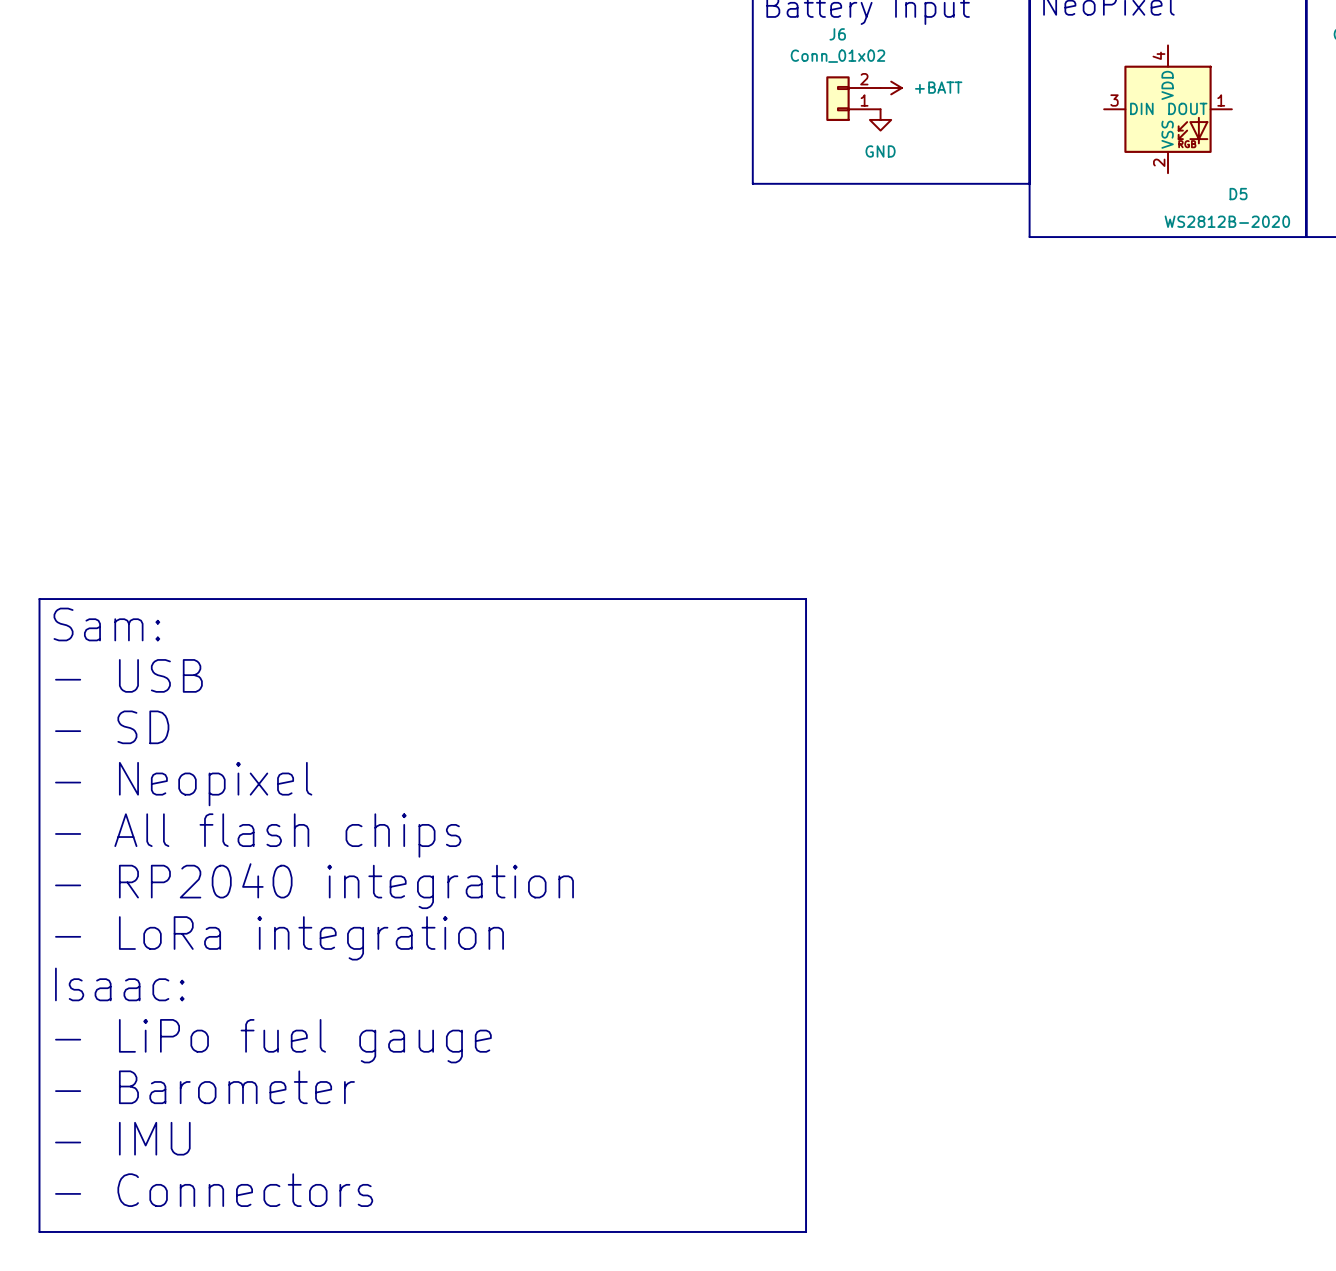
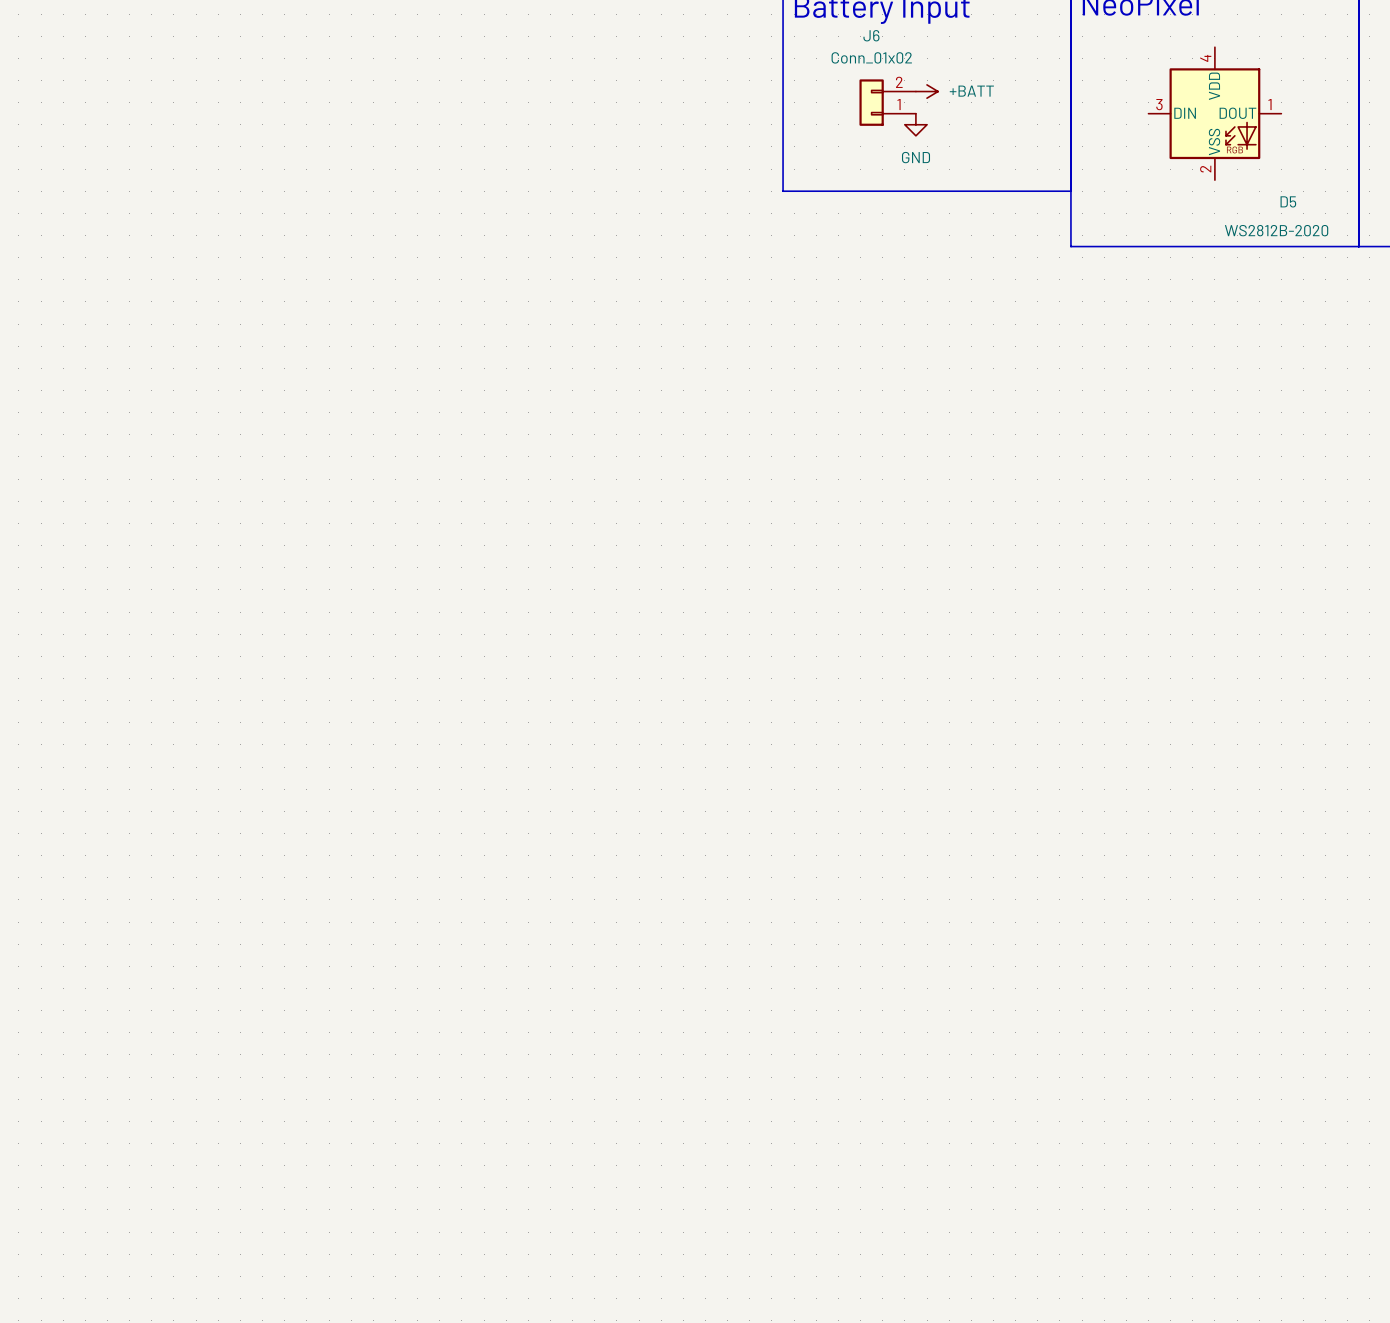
line: (39, 599) (806, 599) (806, 1231) (39, 1231) (39, 599) -> none
text: Sam: (106, 624) -> none
text: - USB (128, 675) -> none
text: - SD (112, 727) -> none
text: - Neopixel (183, 784) -> none
text: - All flash chips (258, 835) -> none
text: - RP2040 integration (314, 886) -> none
text: - LoRa integration (279, 938) -> none
text: Isaac: (119, 984) -> none
text: - LiPo fuel gauge (273, 1041) -> none
text: - Barometer (204, 1087) -> none
text: - IMU (122, 1138) -> none
text: - Connectors (214, 1190) -> none

